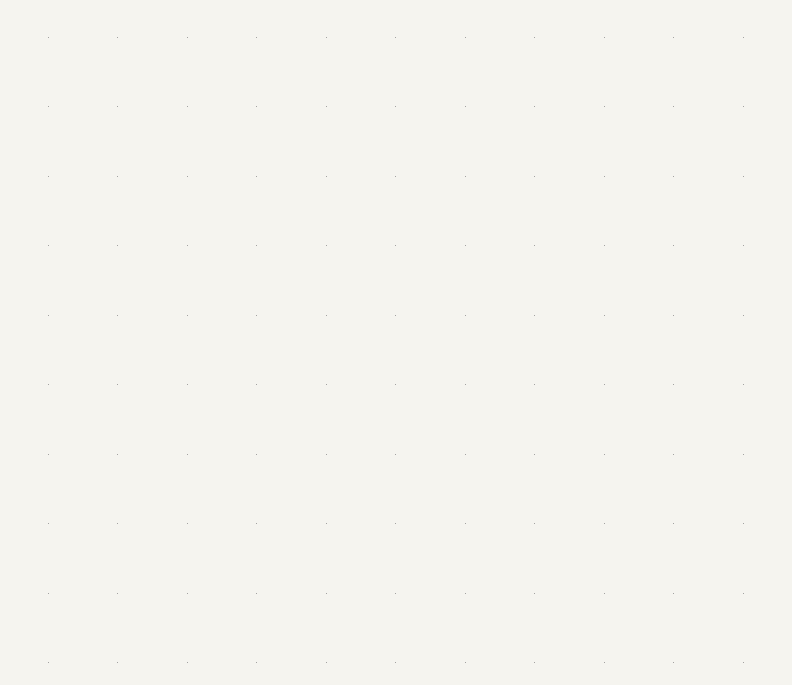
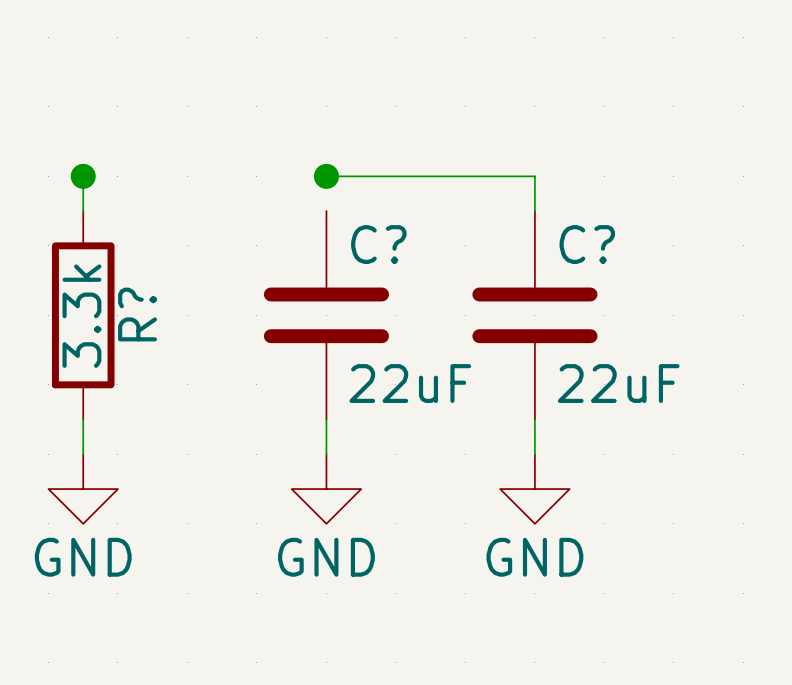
wire: none -> (83, 176) (83, 211)
junction: none -> (83, 176)
wire: none -> (326, 176) (534, 176) (534, 211)
junction: none -> (326, 176)
R?: none -> 3.3k (83, 315)
C?: none -> 22uF (326, 315)
C?: none -> 22uF (534, 315)
wire: none -> (83, 419) (83, 454)
wire: none -> (326, 419) (326, 454)
wire: none -> (534, 419) (534, 454)
power symbol: none -> GND (83, 489)
power symbol: none -> GND (326, 489)
power symbol: none -> GND (534, 489)

